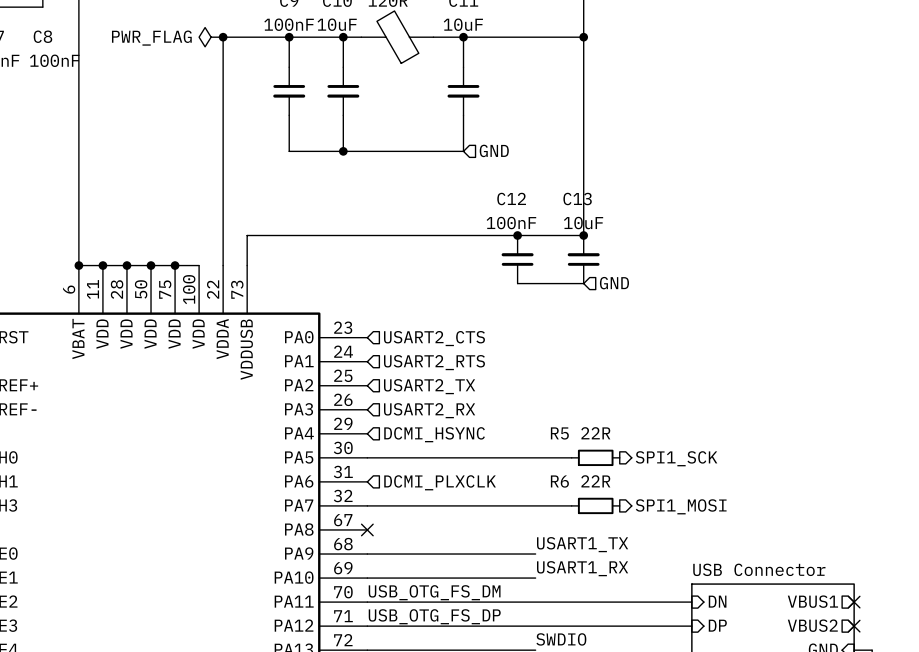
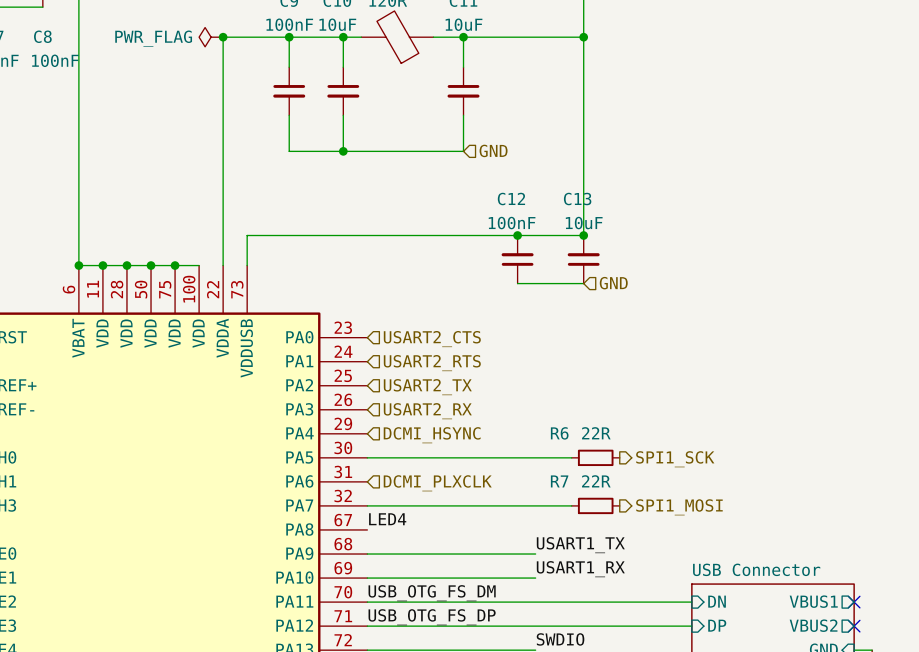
R5 name: R5 (559, 433) -> R6 (559, 433)
R6 name: R6 (559, 481) -> R7 (559, 481)
label: none -> LED4 (387, 519)
no-connect mark: (367, 529) -> none

